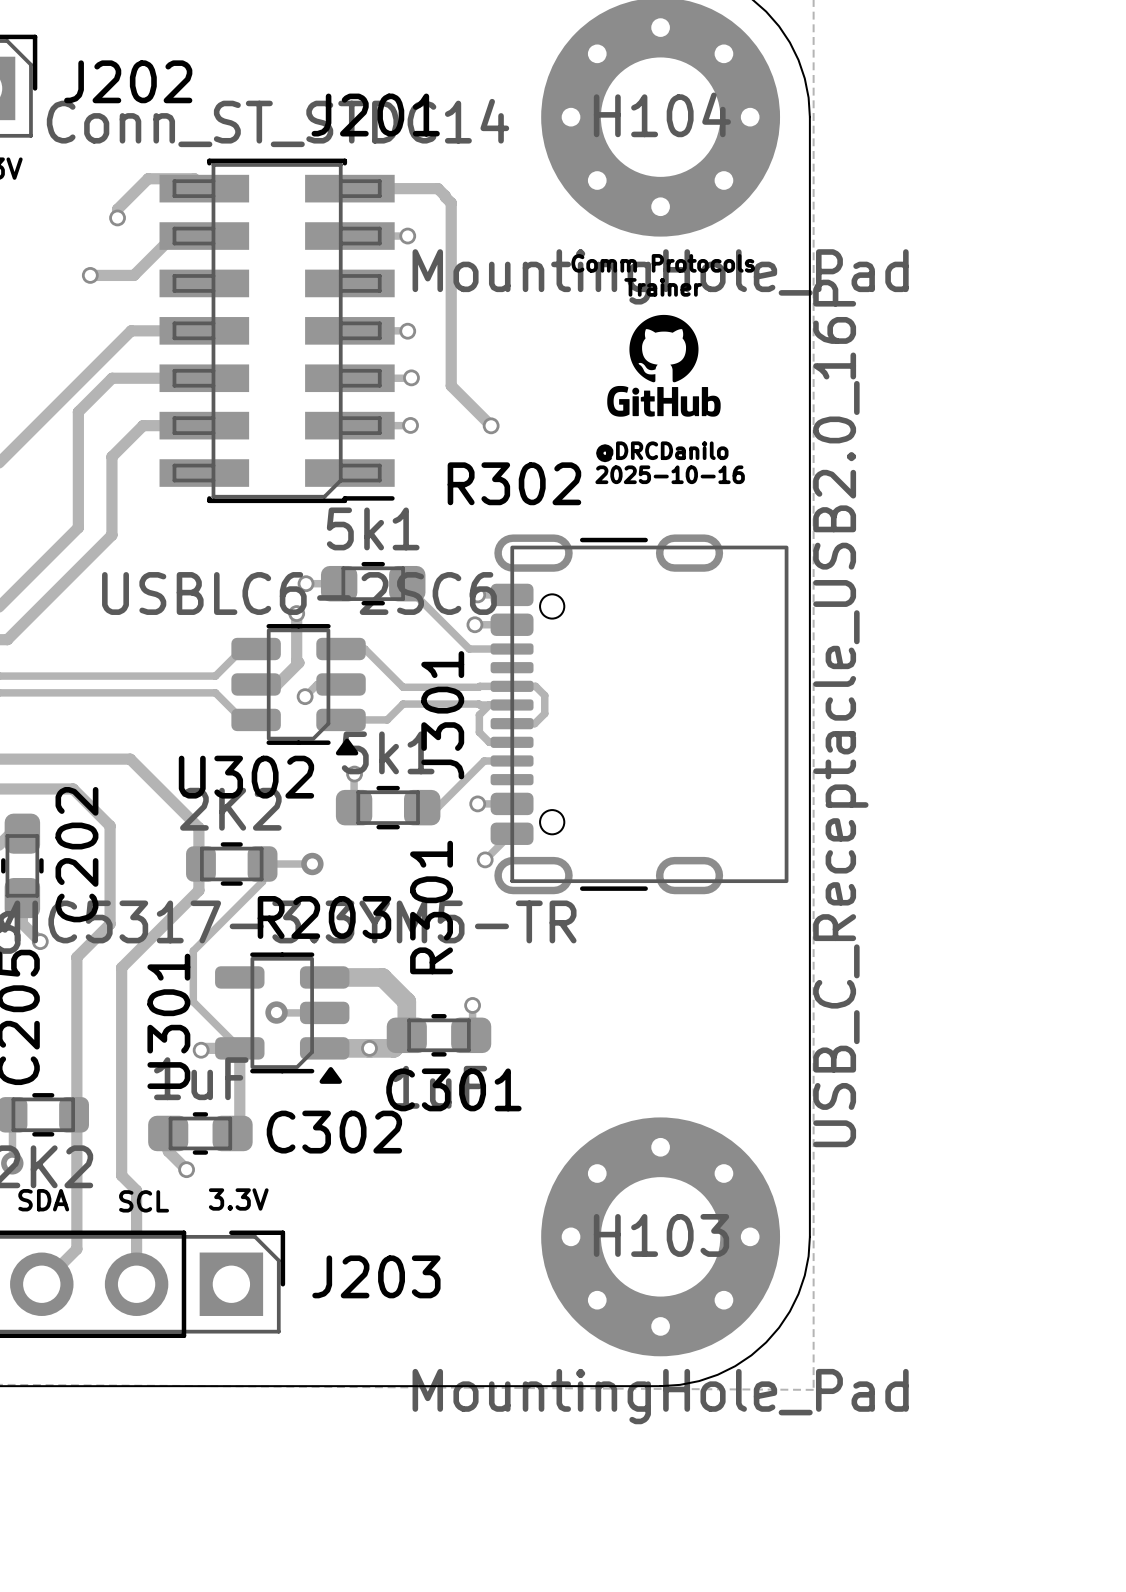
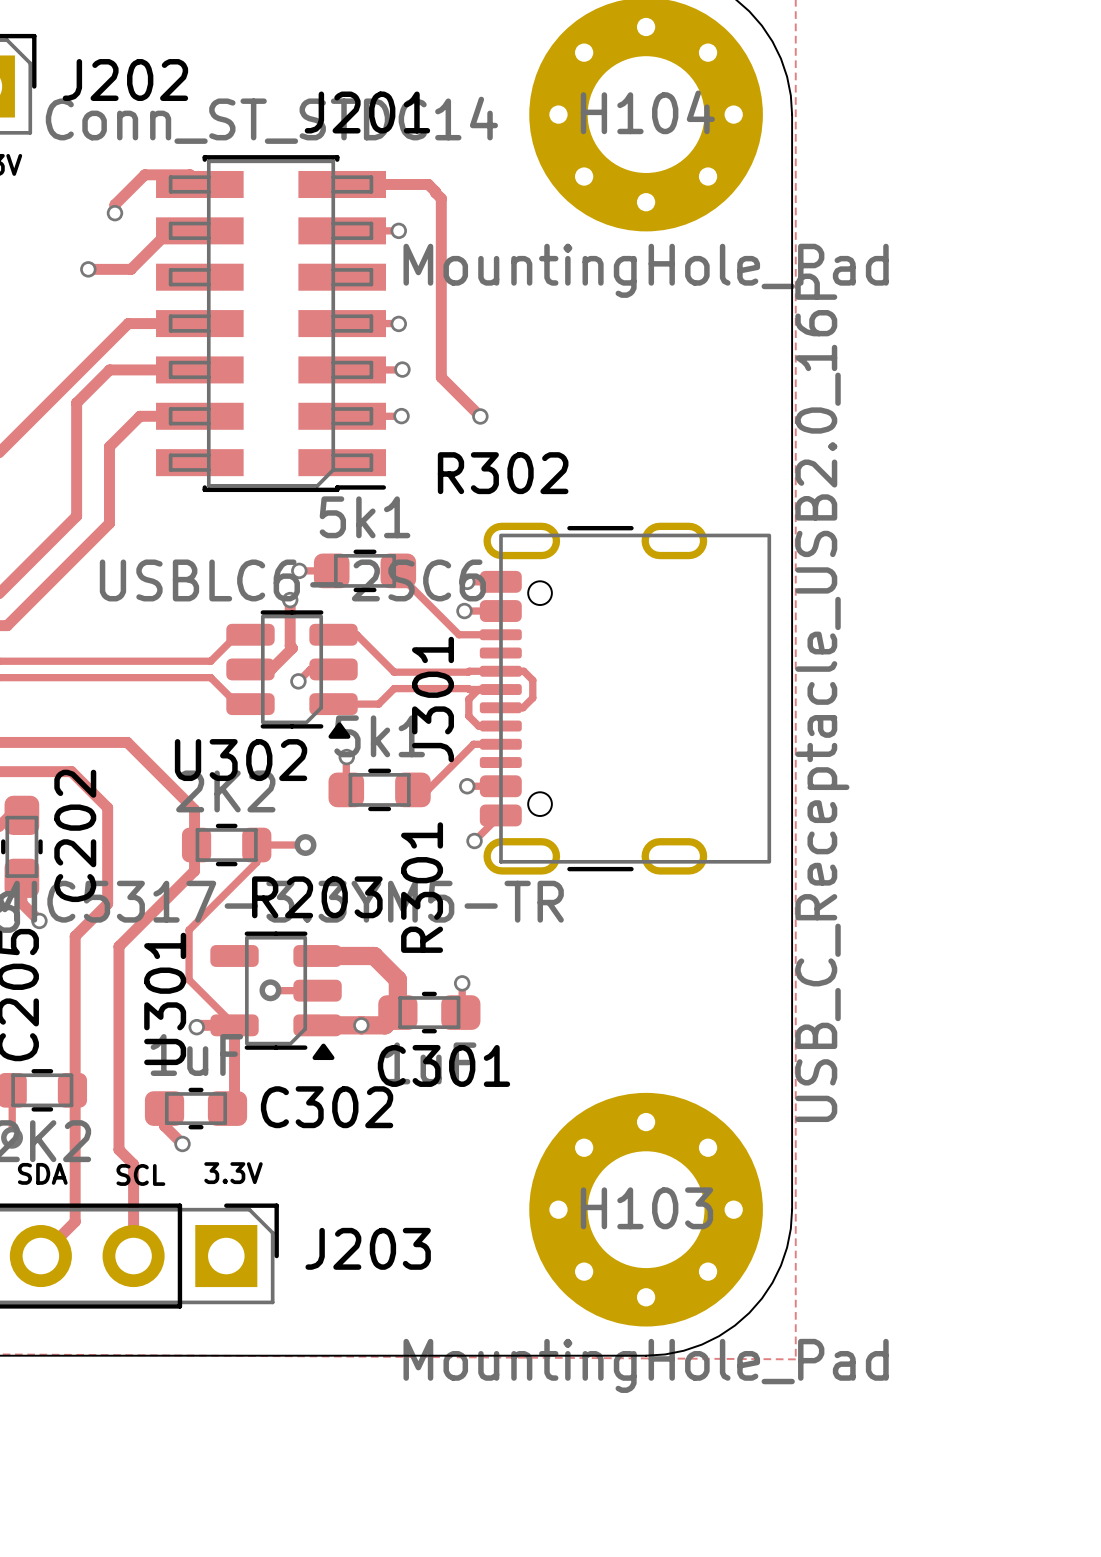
text: Comm Protocols (663, 263) -> none
text: Trainer (663, 287) -> none
drawing: [607, 314, 721, 417] -> none
text: @DRCDanilo (662, 451) -> none
text: 2025-10-16 (670, 474) -> none

